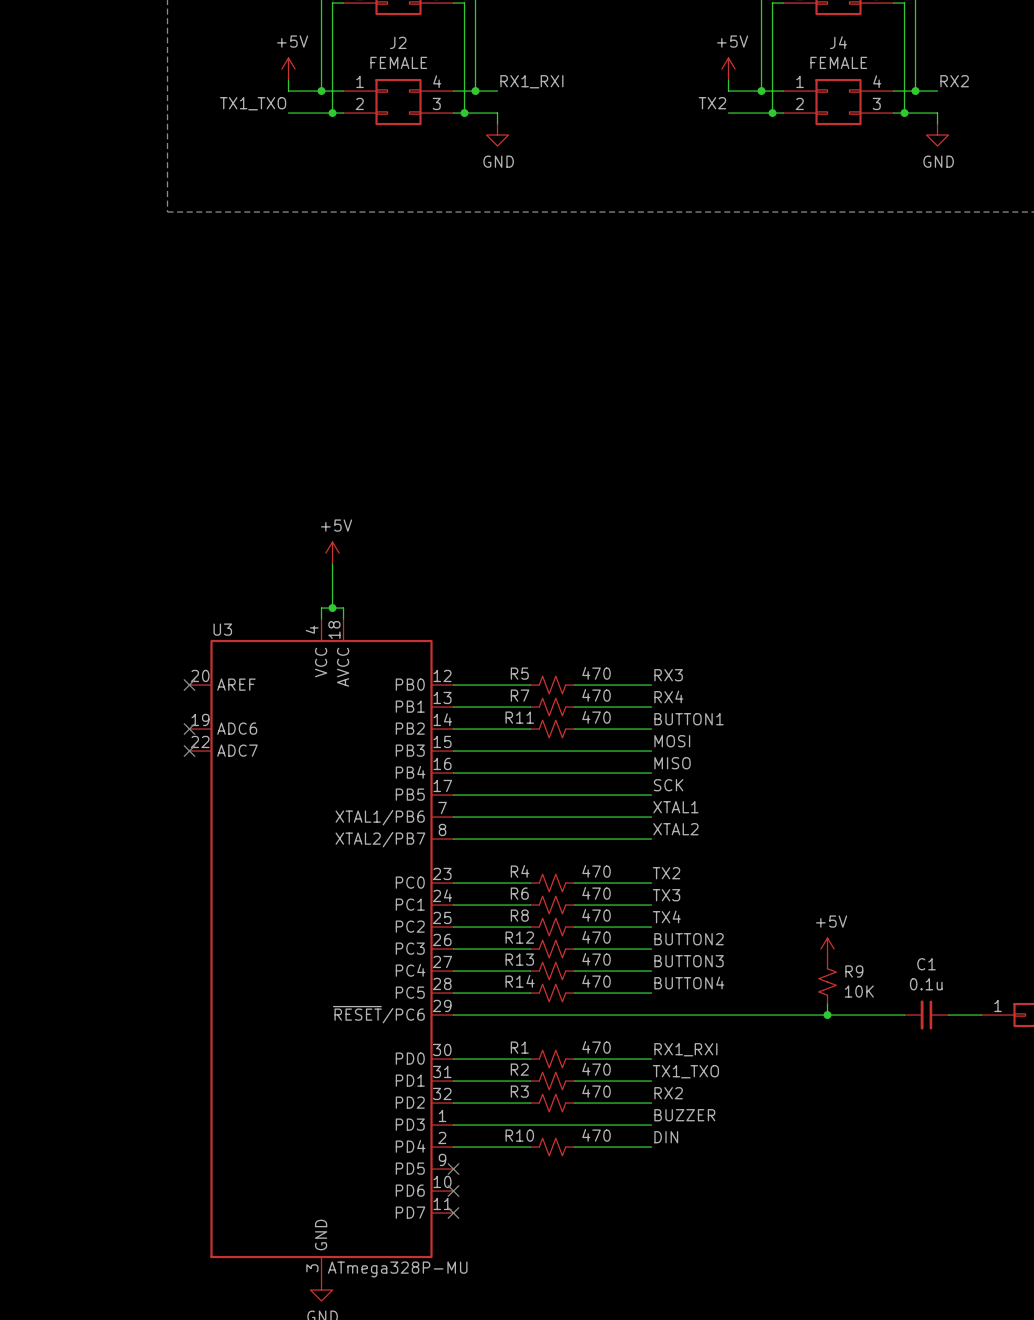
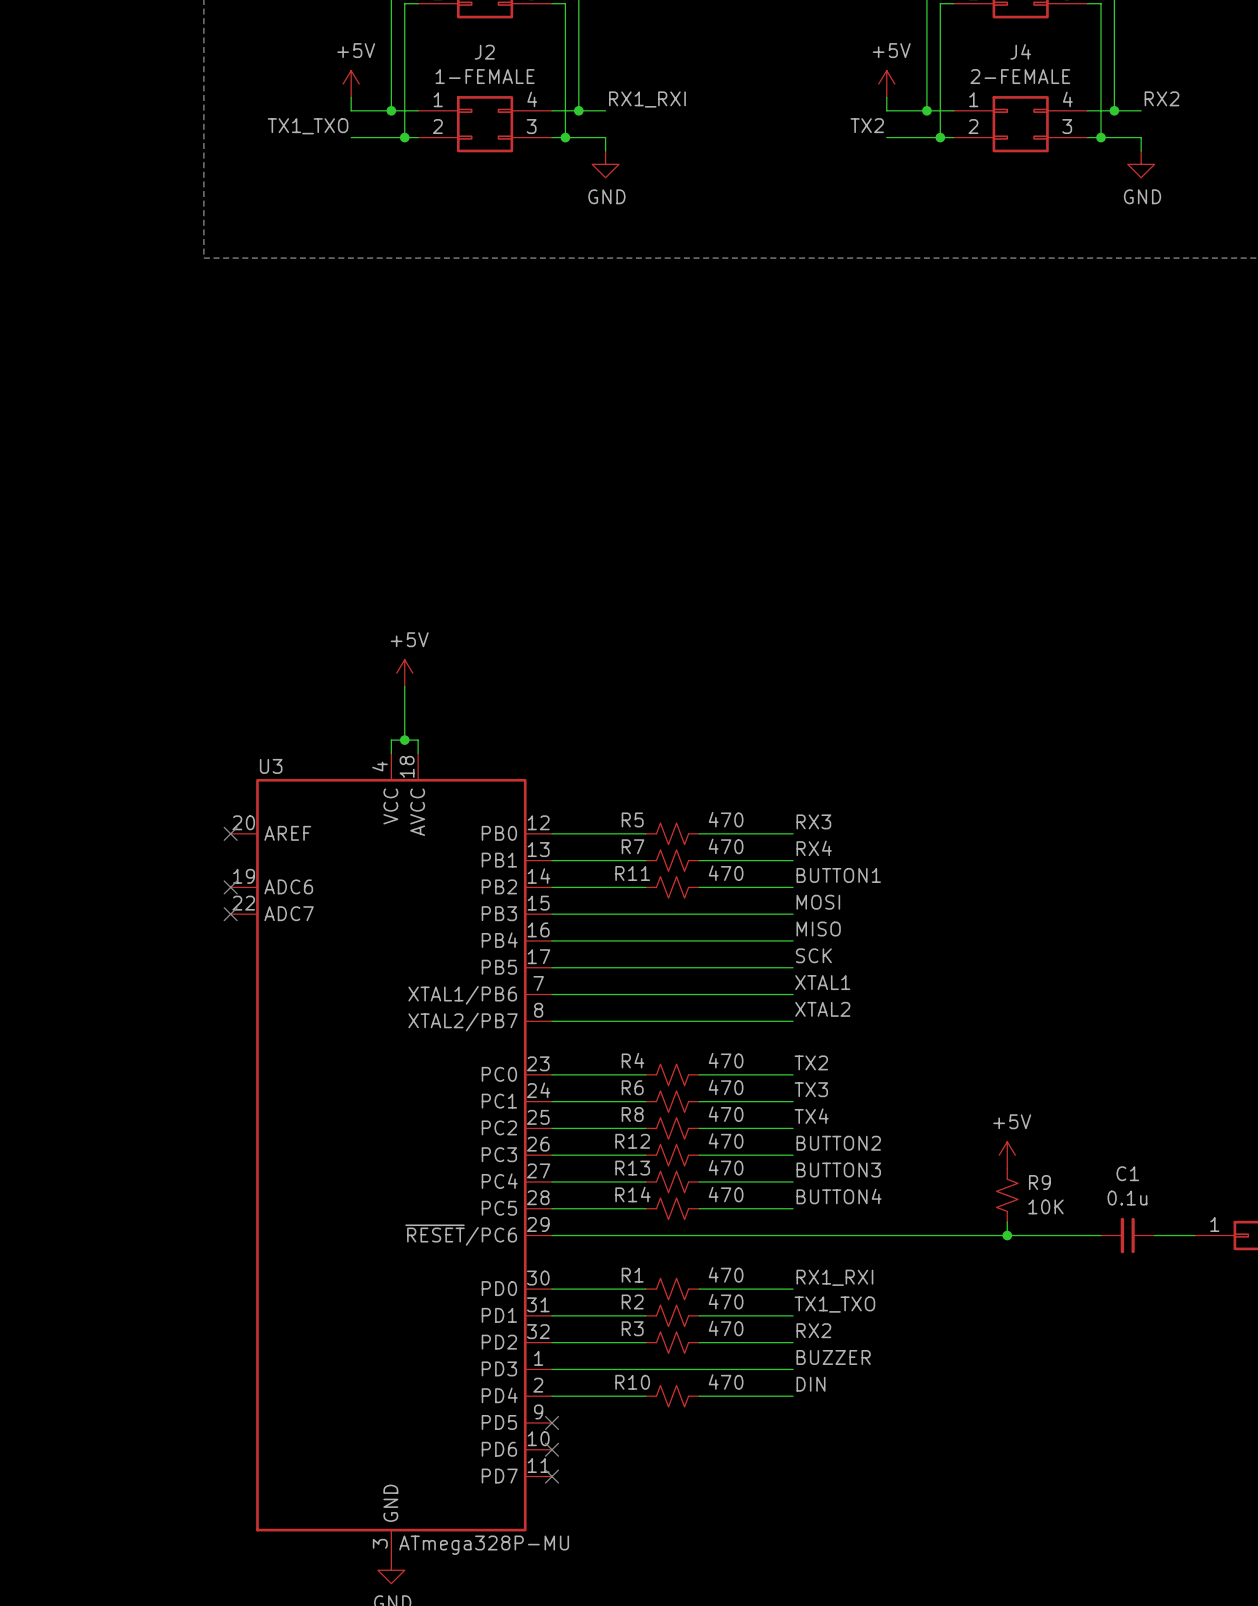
J2 value: FEMALE (398, 62) -> 1-FEMALE (485, 76)
J4 value: FEMALE (838, 62) -> 2-FEMALE (1020, 76)

